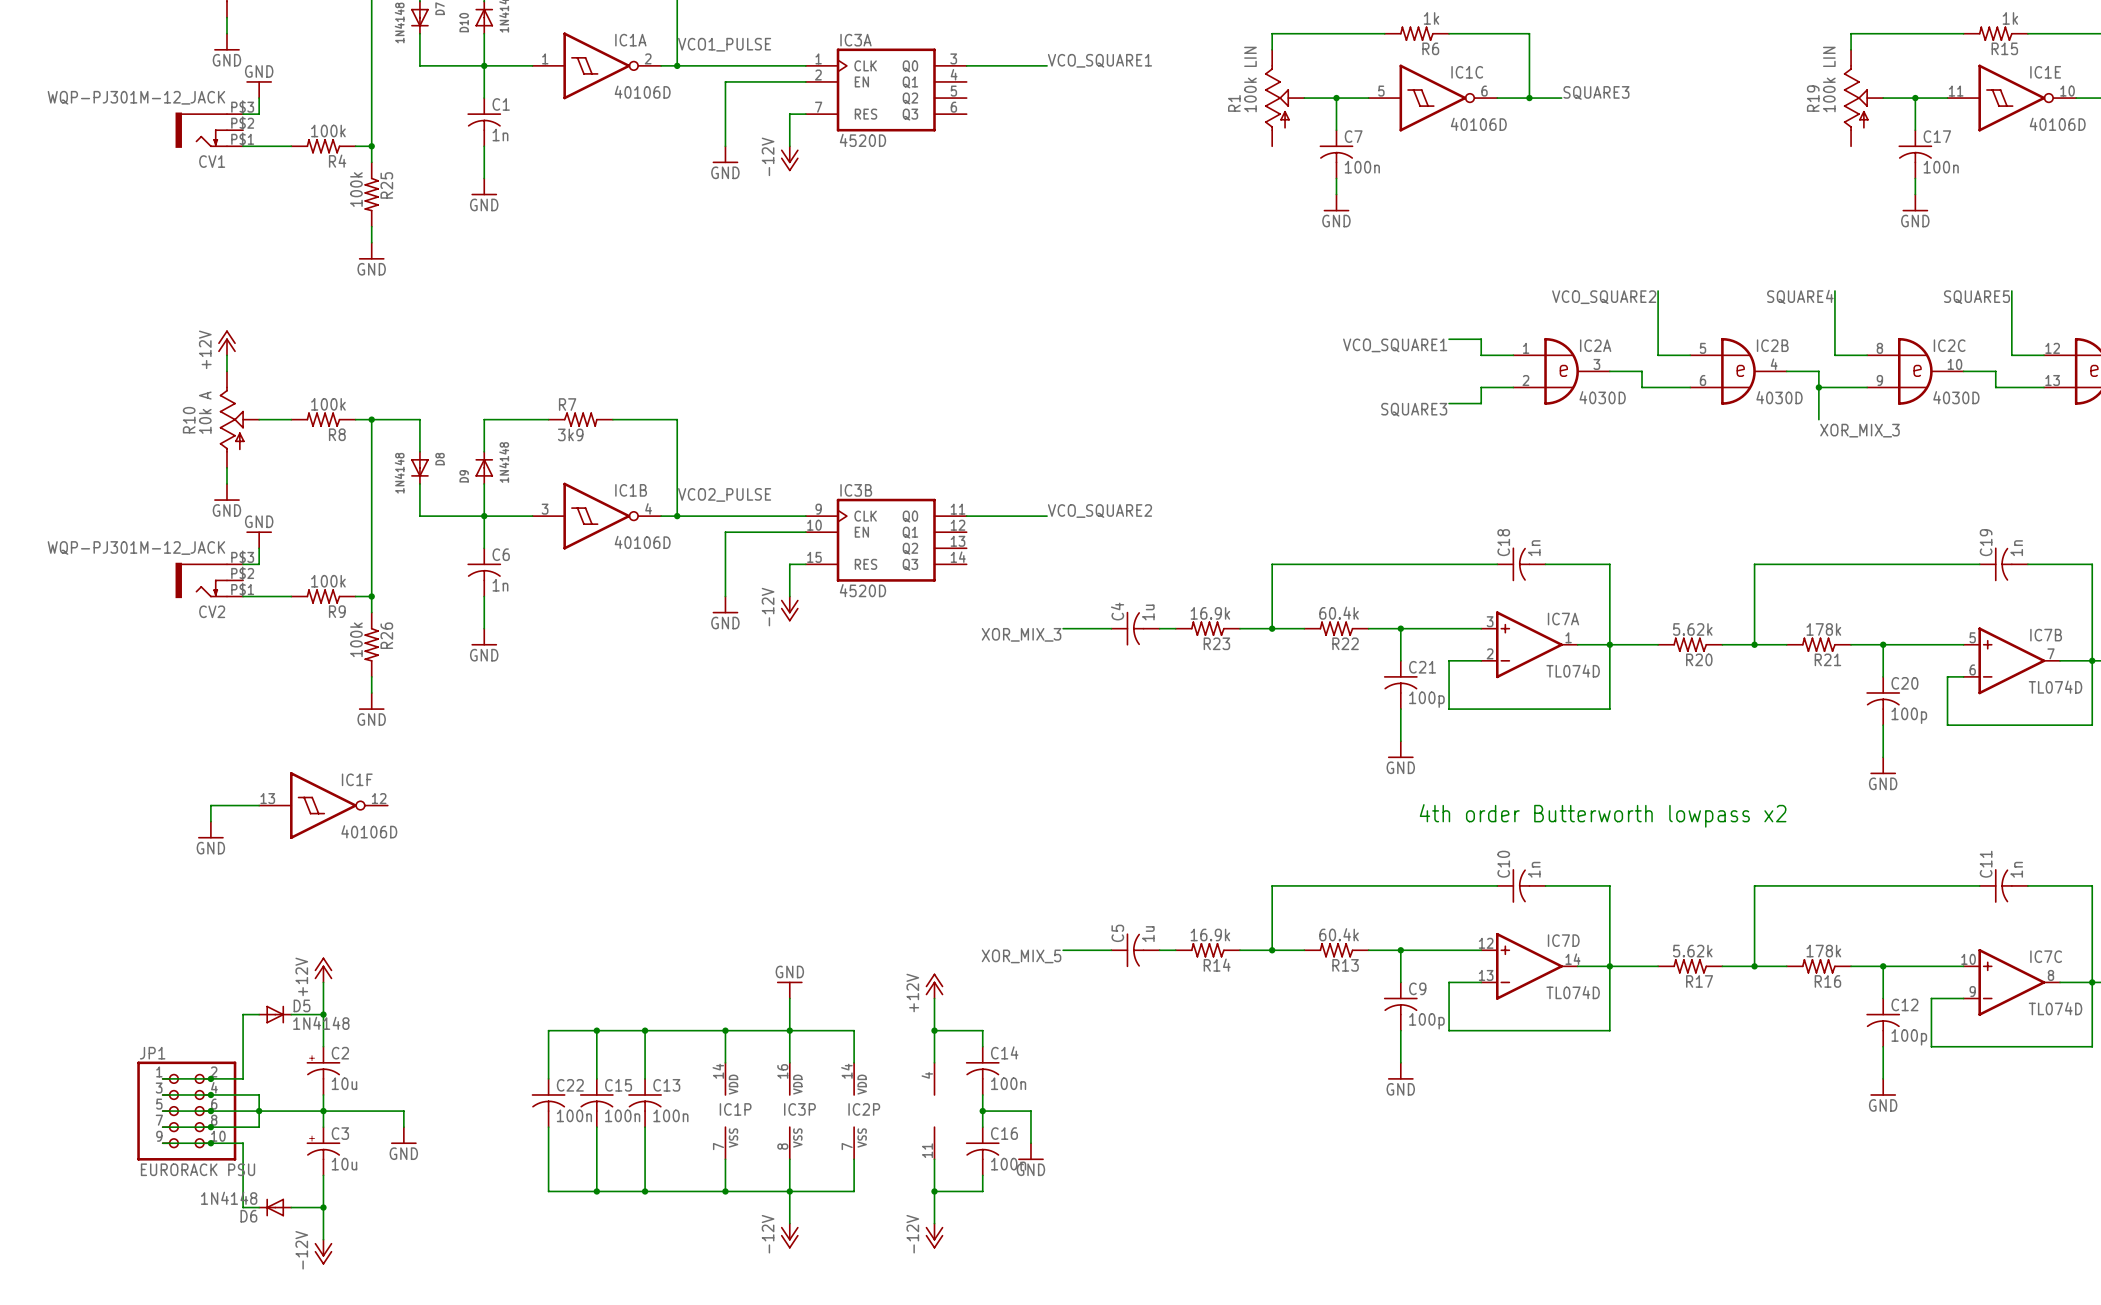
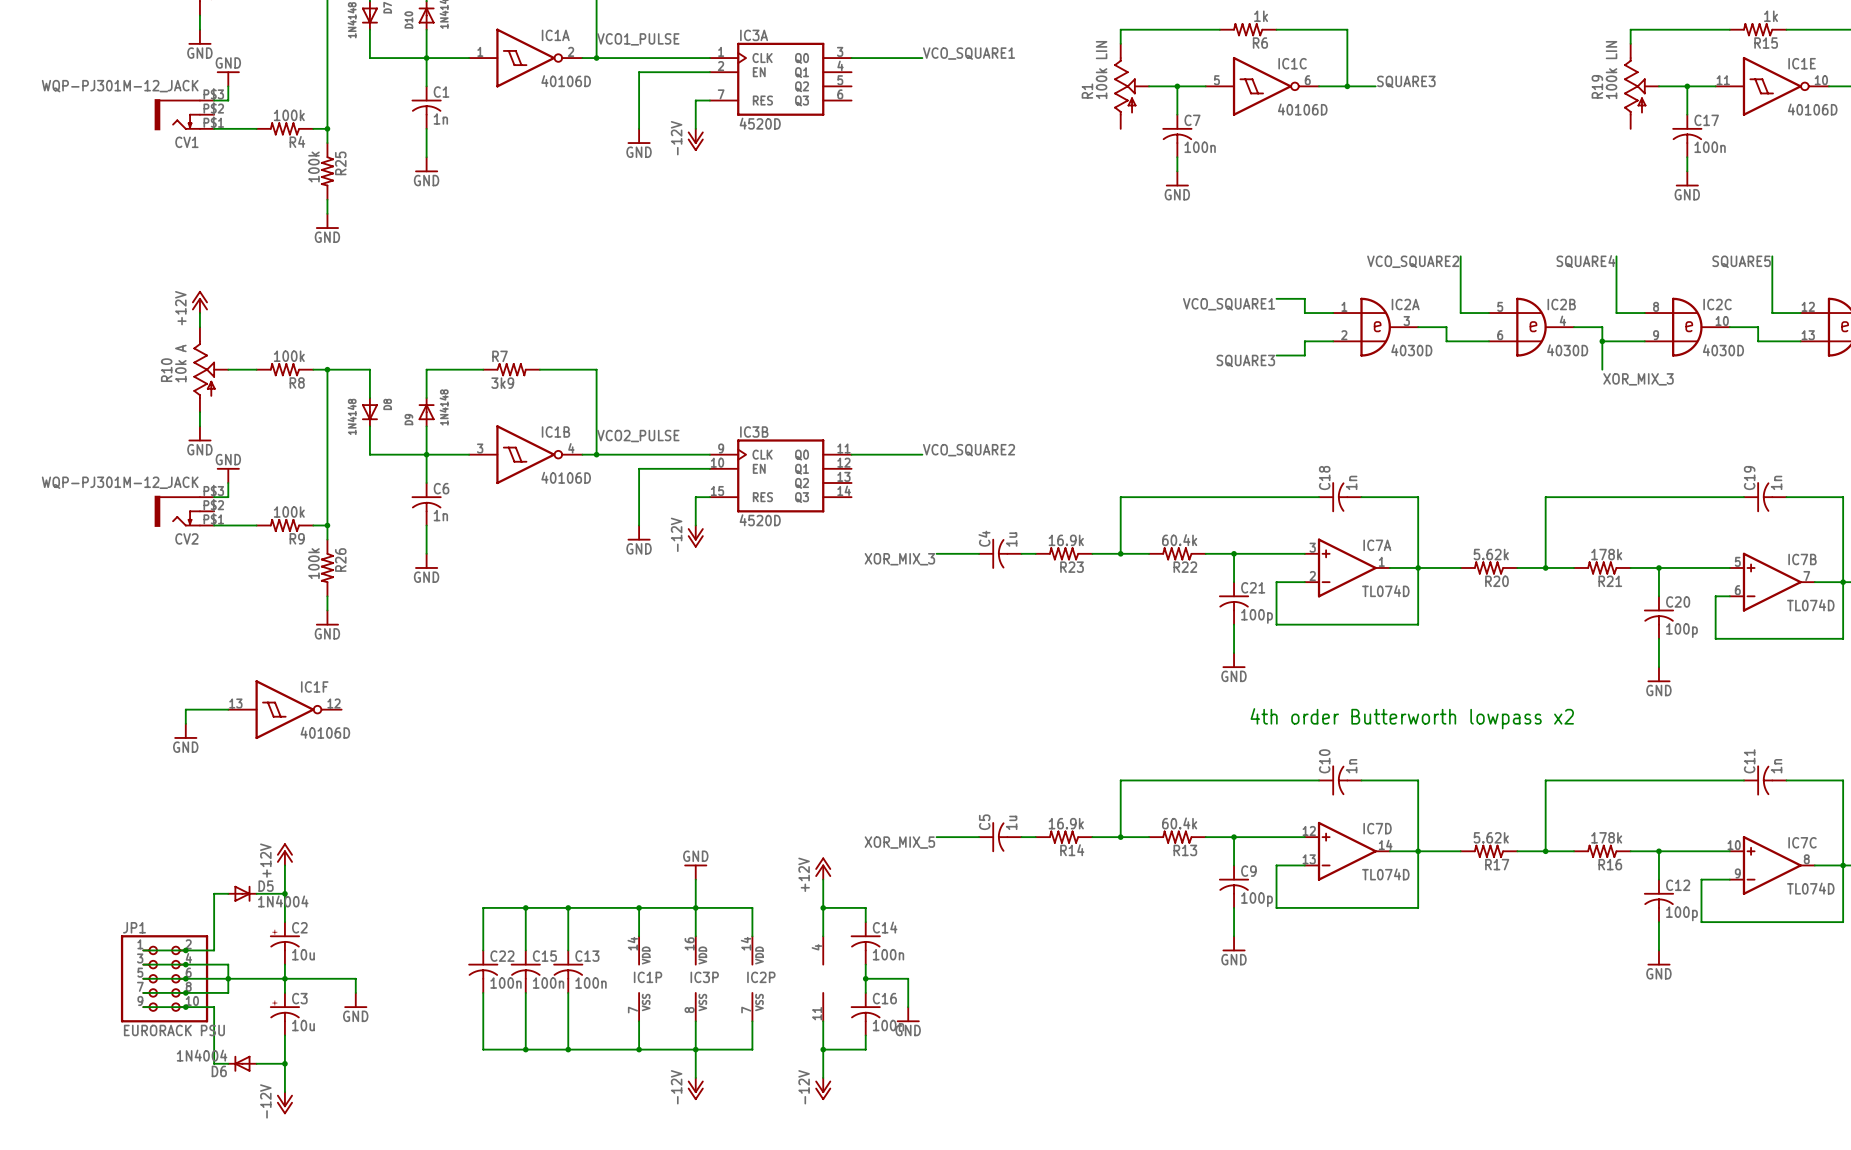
D5 value: 1N4148 (321, 1023) -> 1N4004 (283, 901)
D6 value: 1N4148 (229, 1198) -> 1N4004 (202, 1055)

